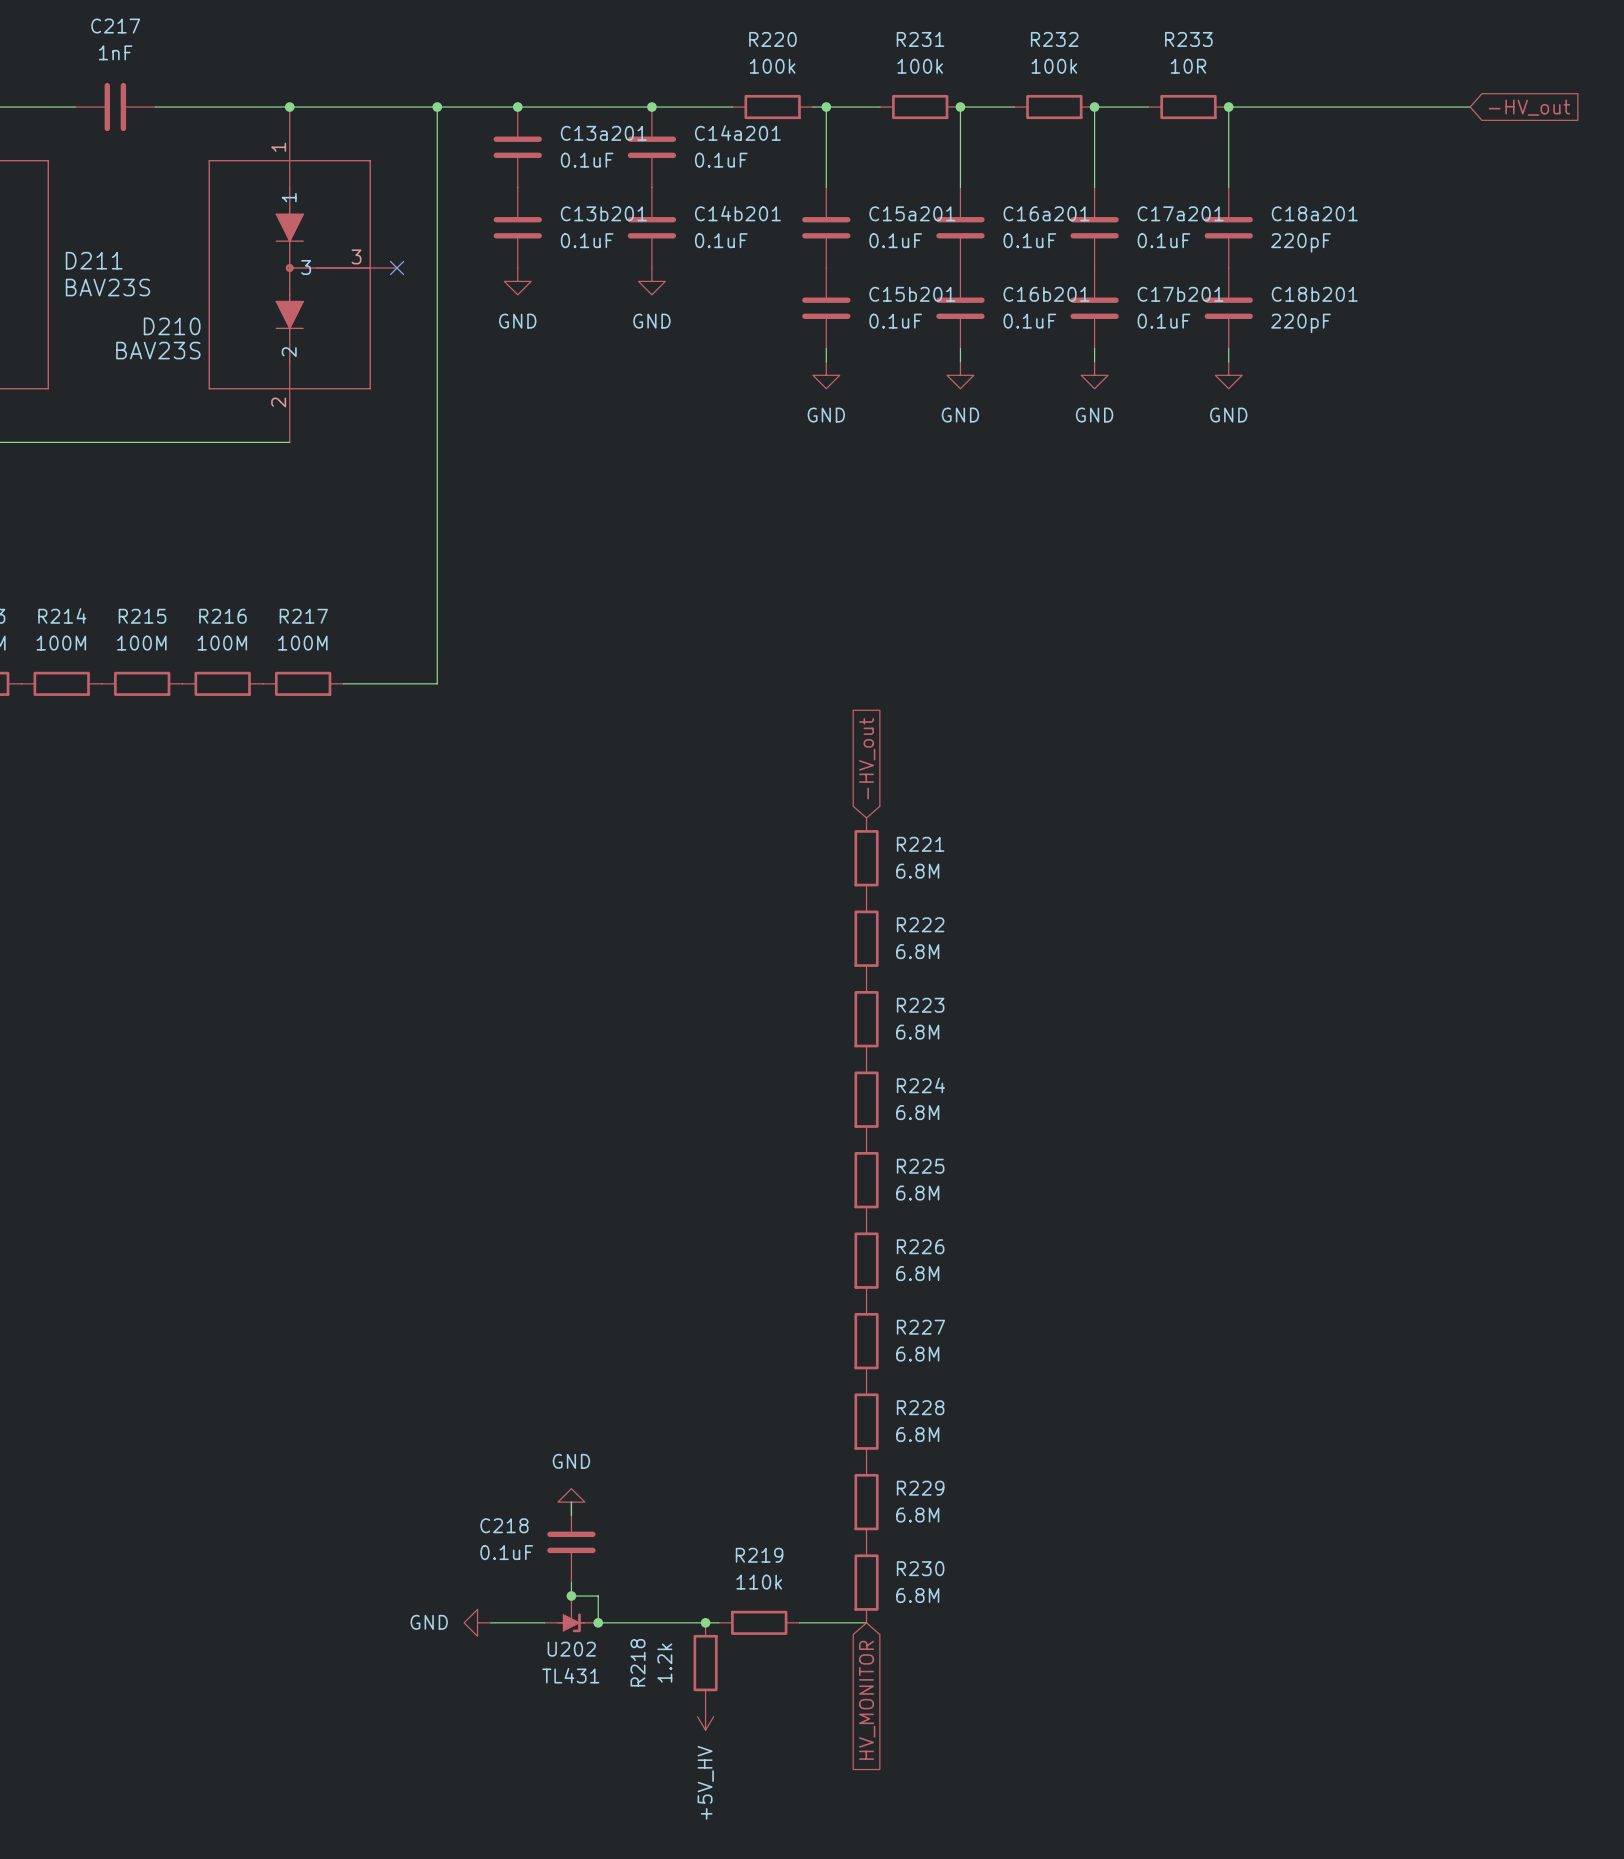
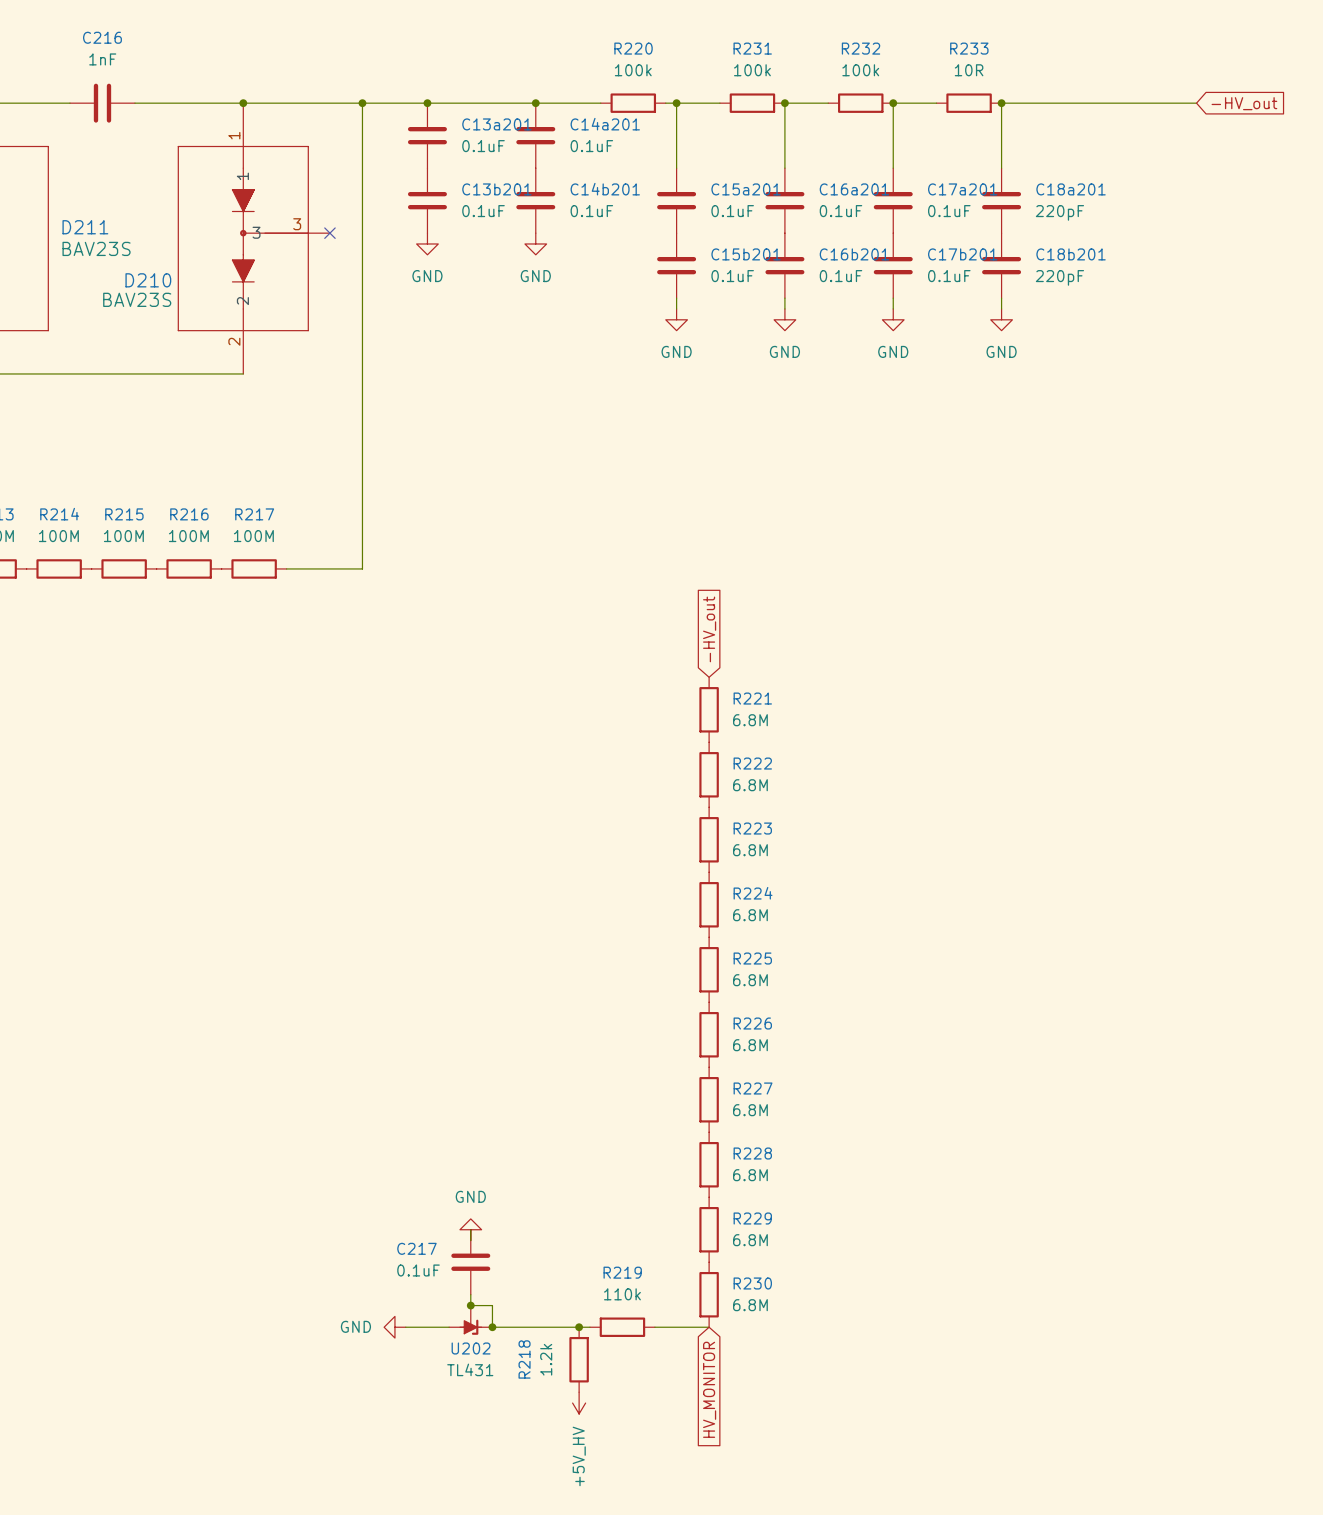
C217 name: C217 (115, 26) -> C216 (102, 37)
C218 name: C218 (504, 1525) -> C217 (416, 1248)

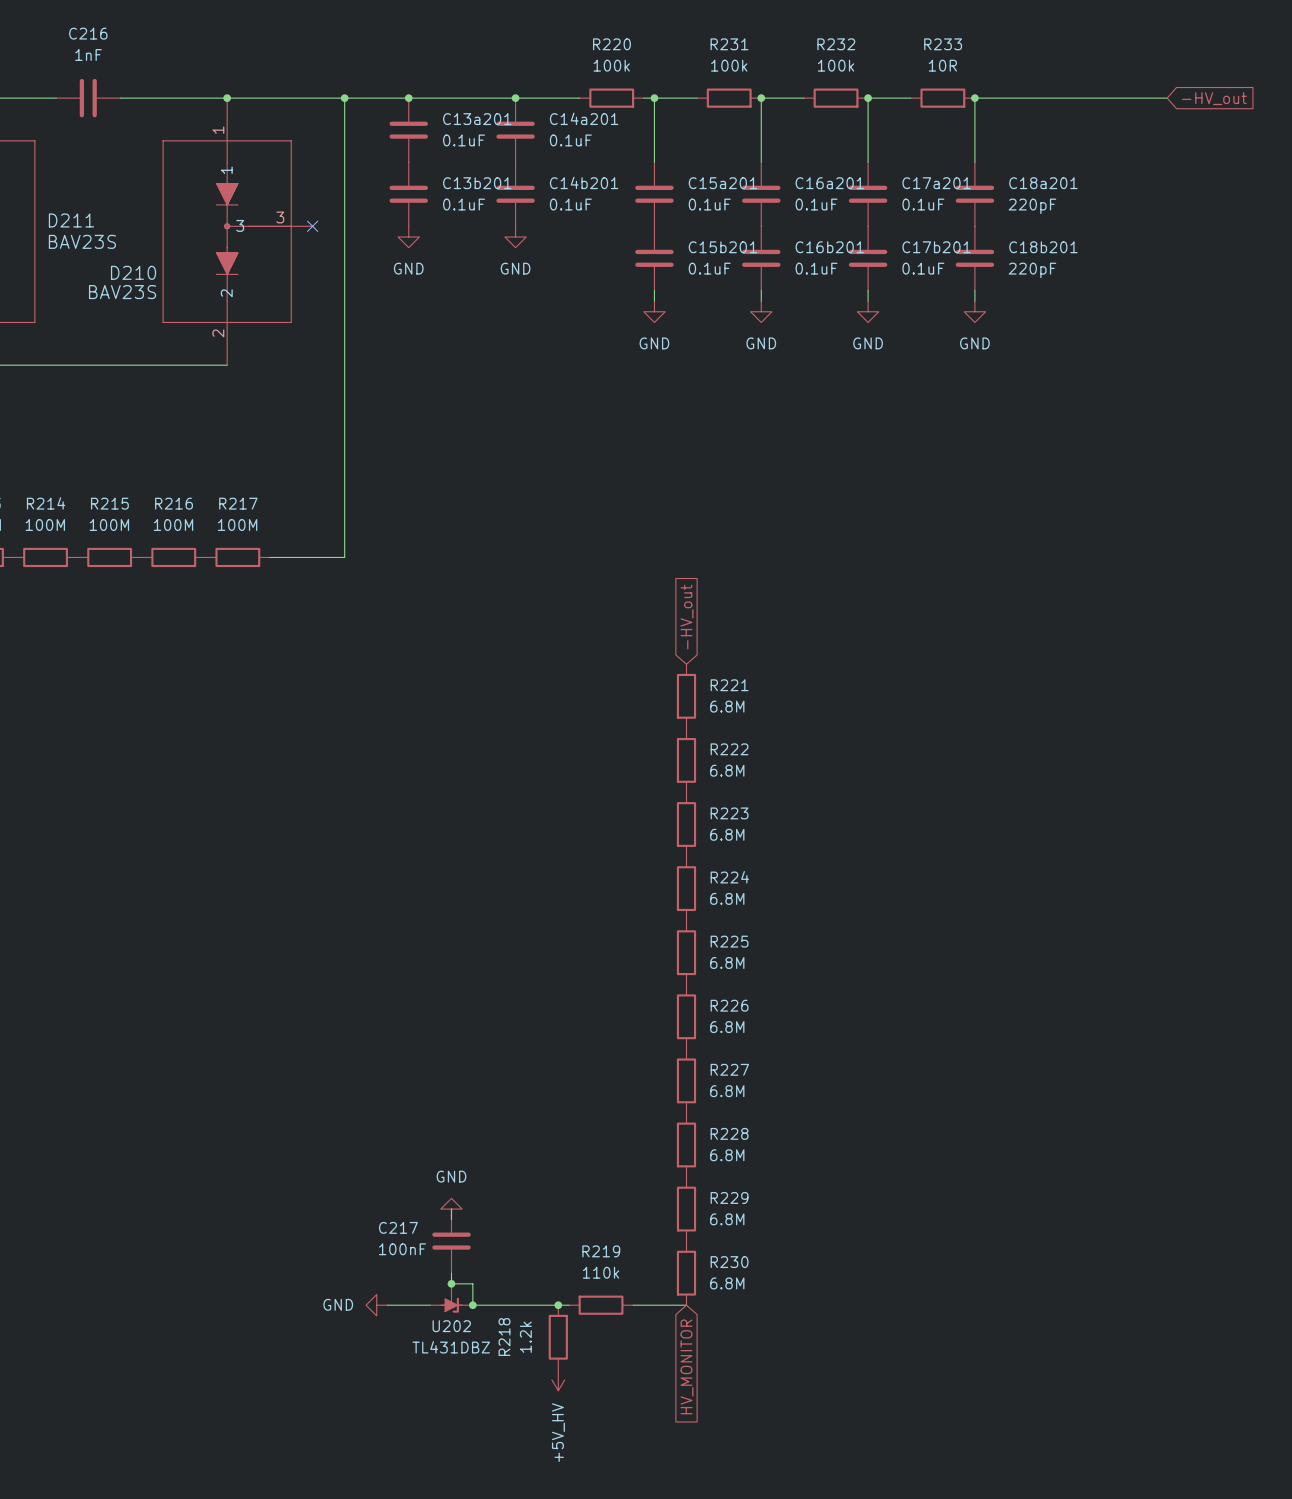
C217 value: 0.1uF (418, 1270) -> 100nF (402, 1249)
U202 value: TL431 (470, 1369) -> TL431DBZ (451, 1347)

